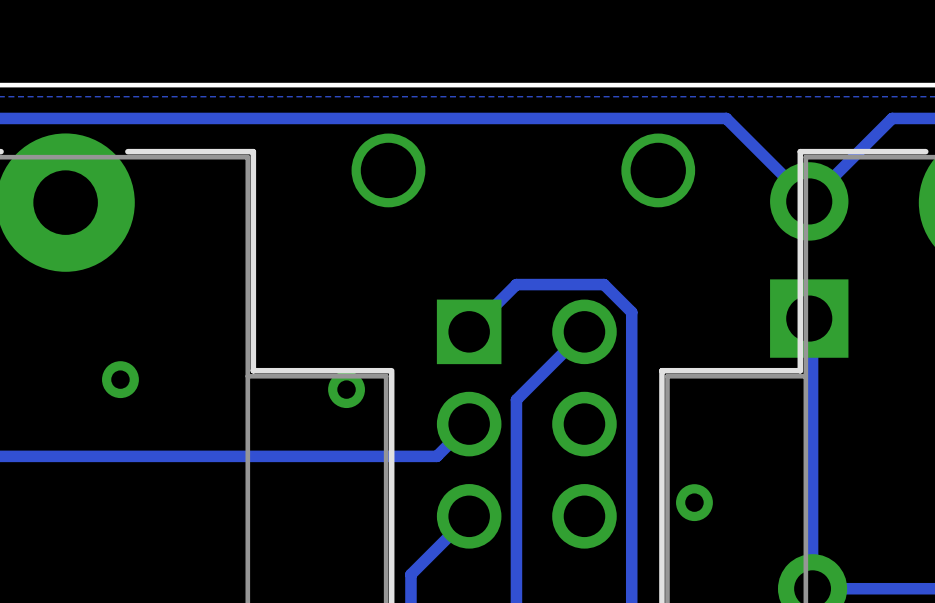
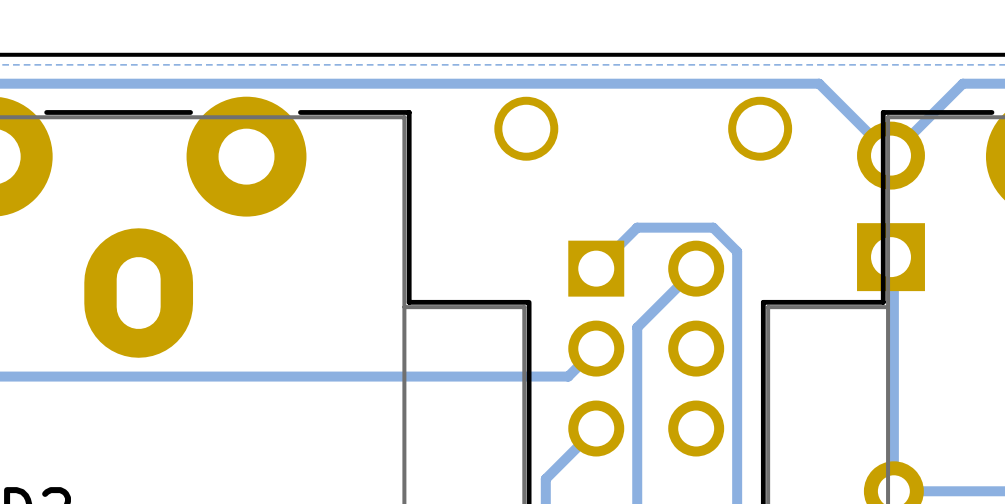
via: (120, 379) -> none
via: (346, 389) -> none
via: (694, 502) -> none

